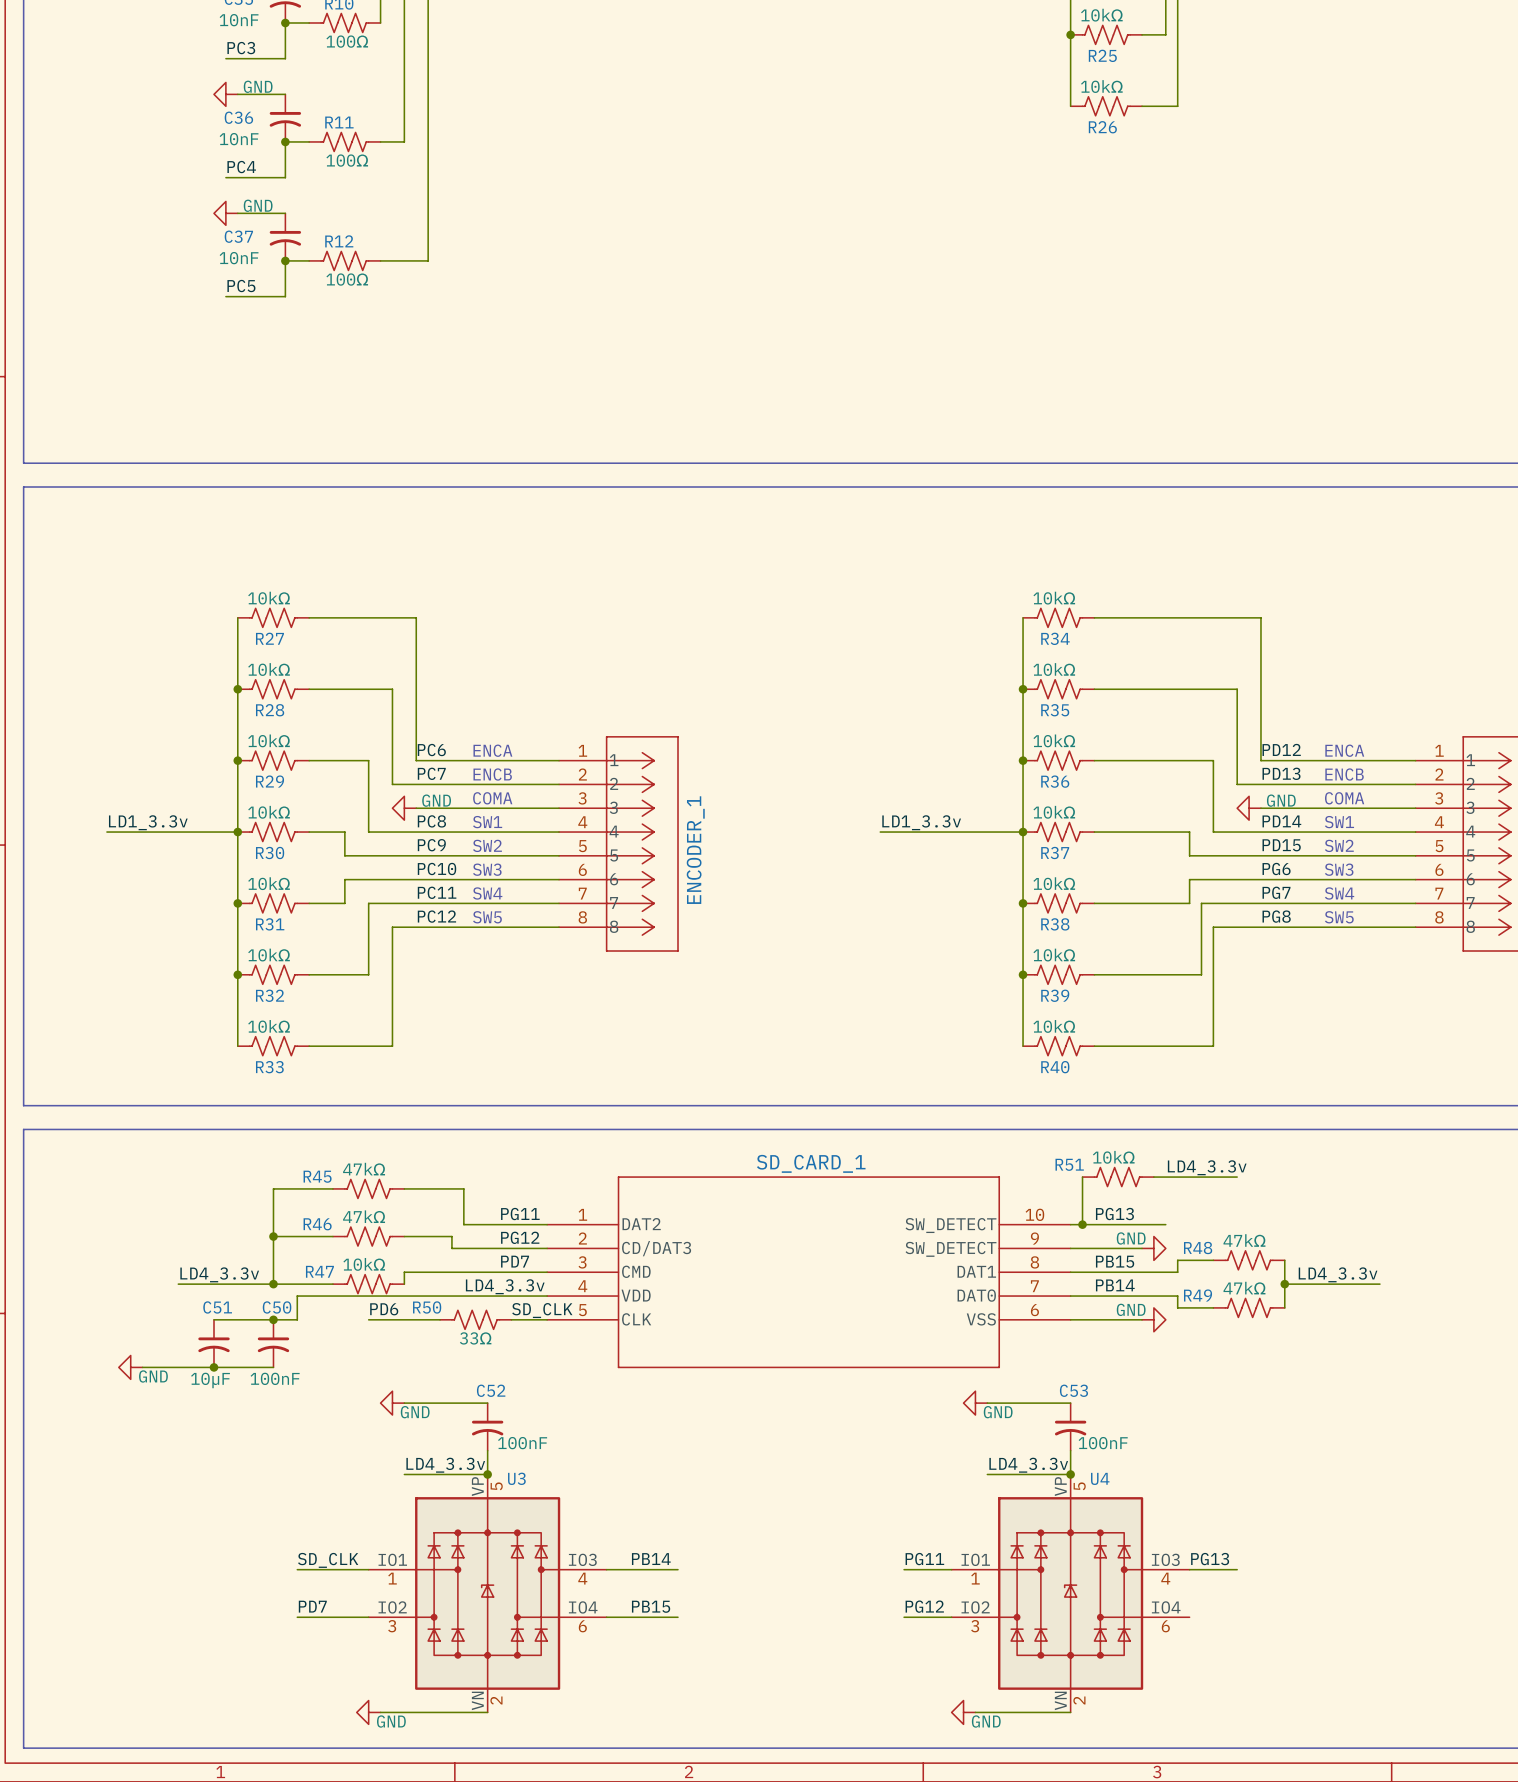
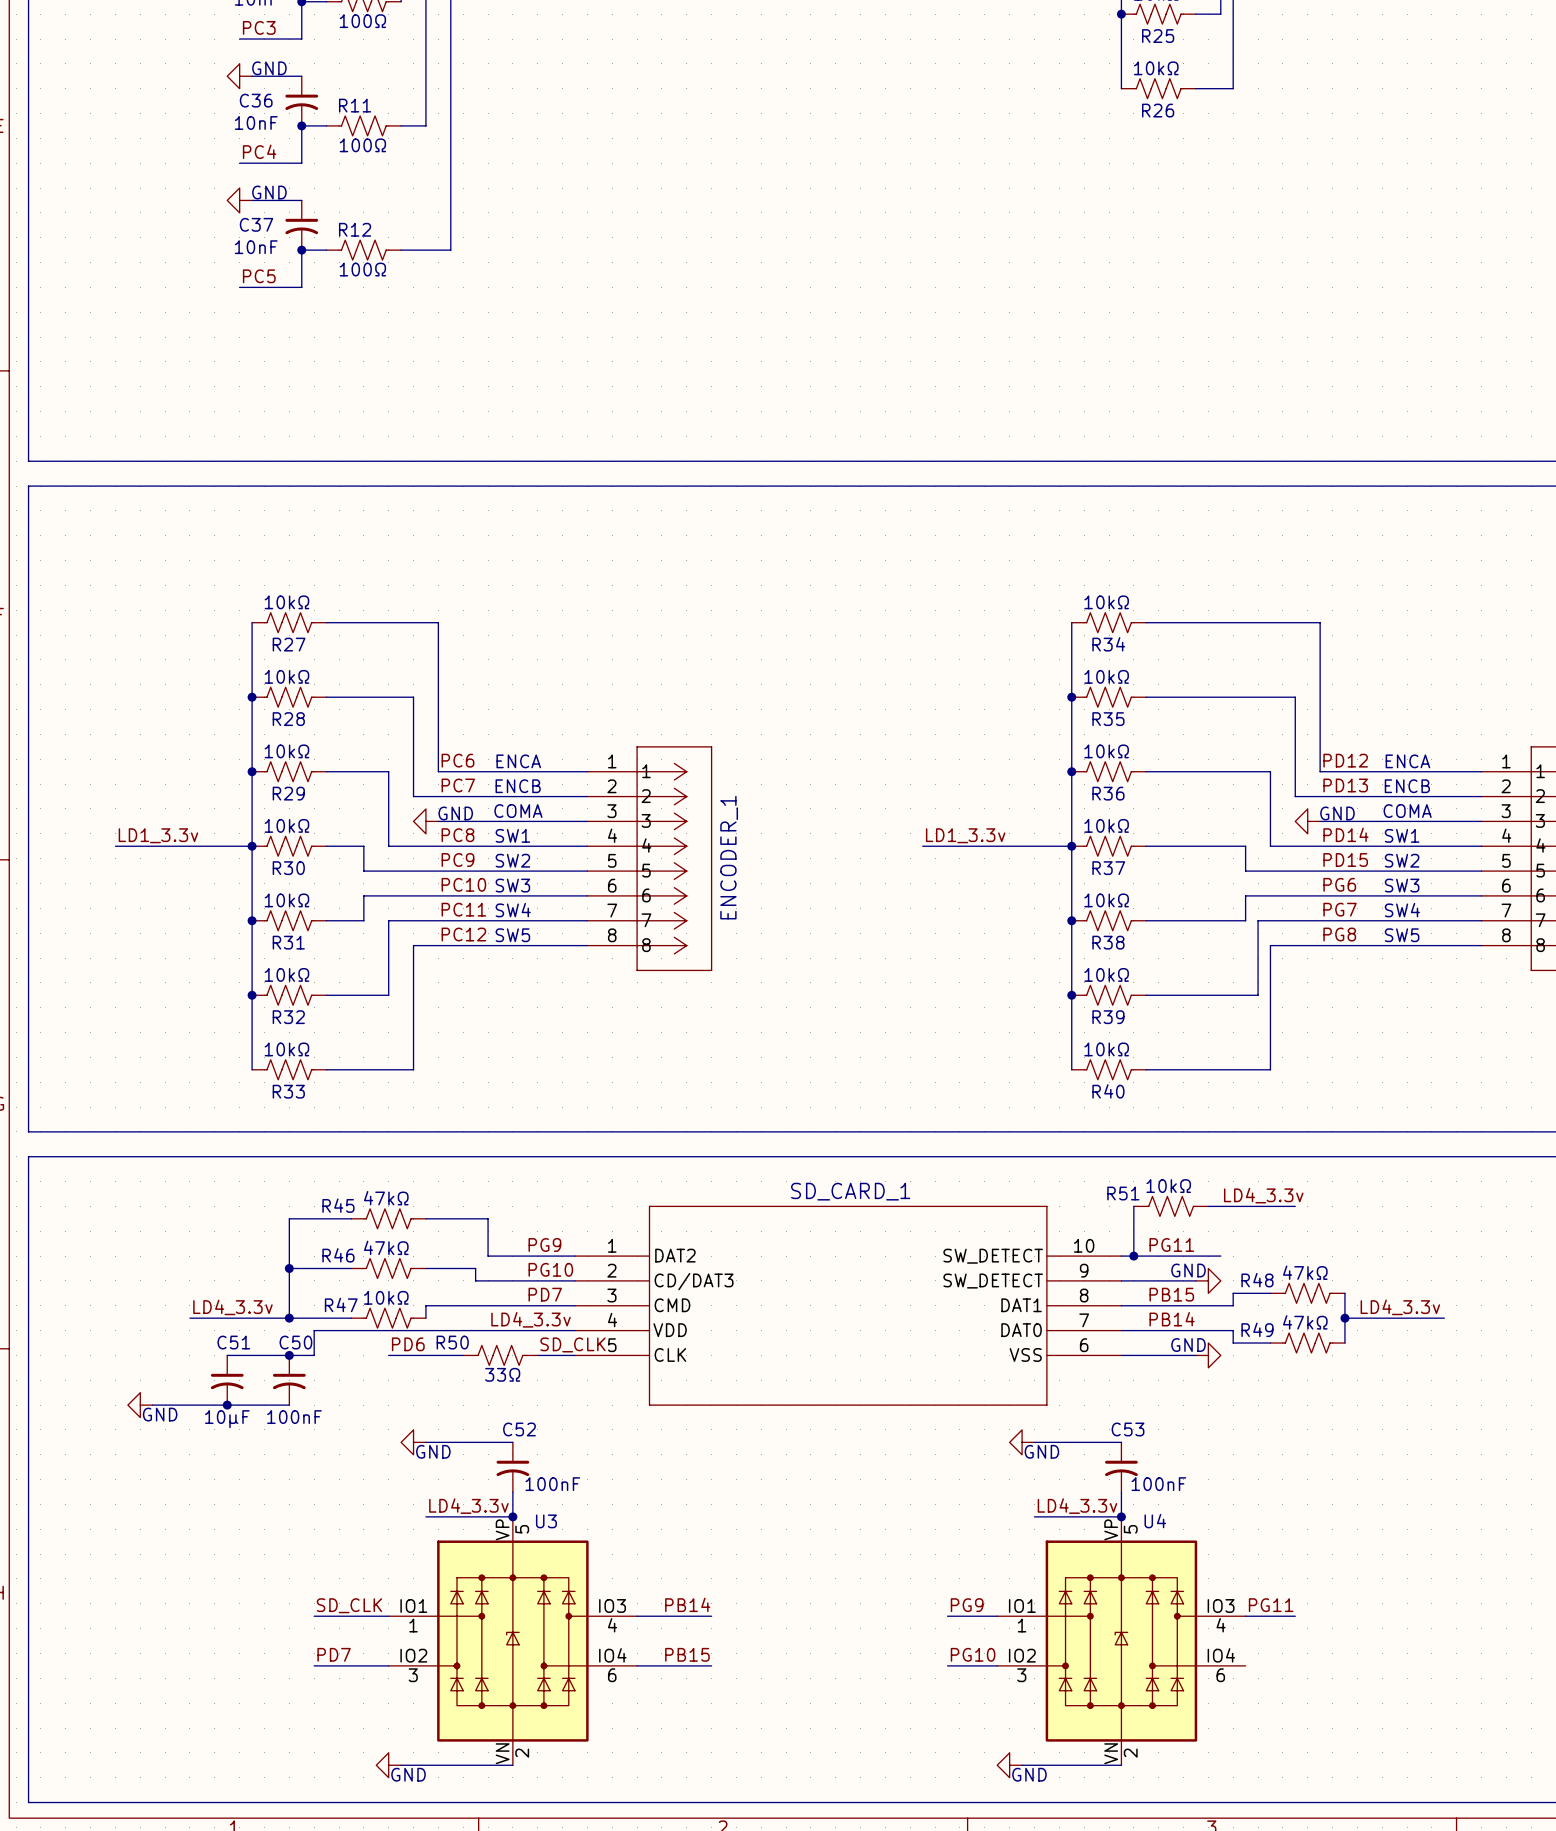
label: PG11 (520, 1214) -> PG9 (544, 1244)
label: PG13 (1114, 1214) -> PG11 (1171, 1244)
label: PG12 (520, 1237) -> PG10 (550, 1269)
label: PG11 (924, 1559) -> PG9 (967, 1605)
label: PG13 (1210, 1559) -> PG11 (1271, 1605)
label: PG12 (924, 1606) -> PG10 (973, 1654)

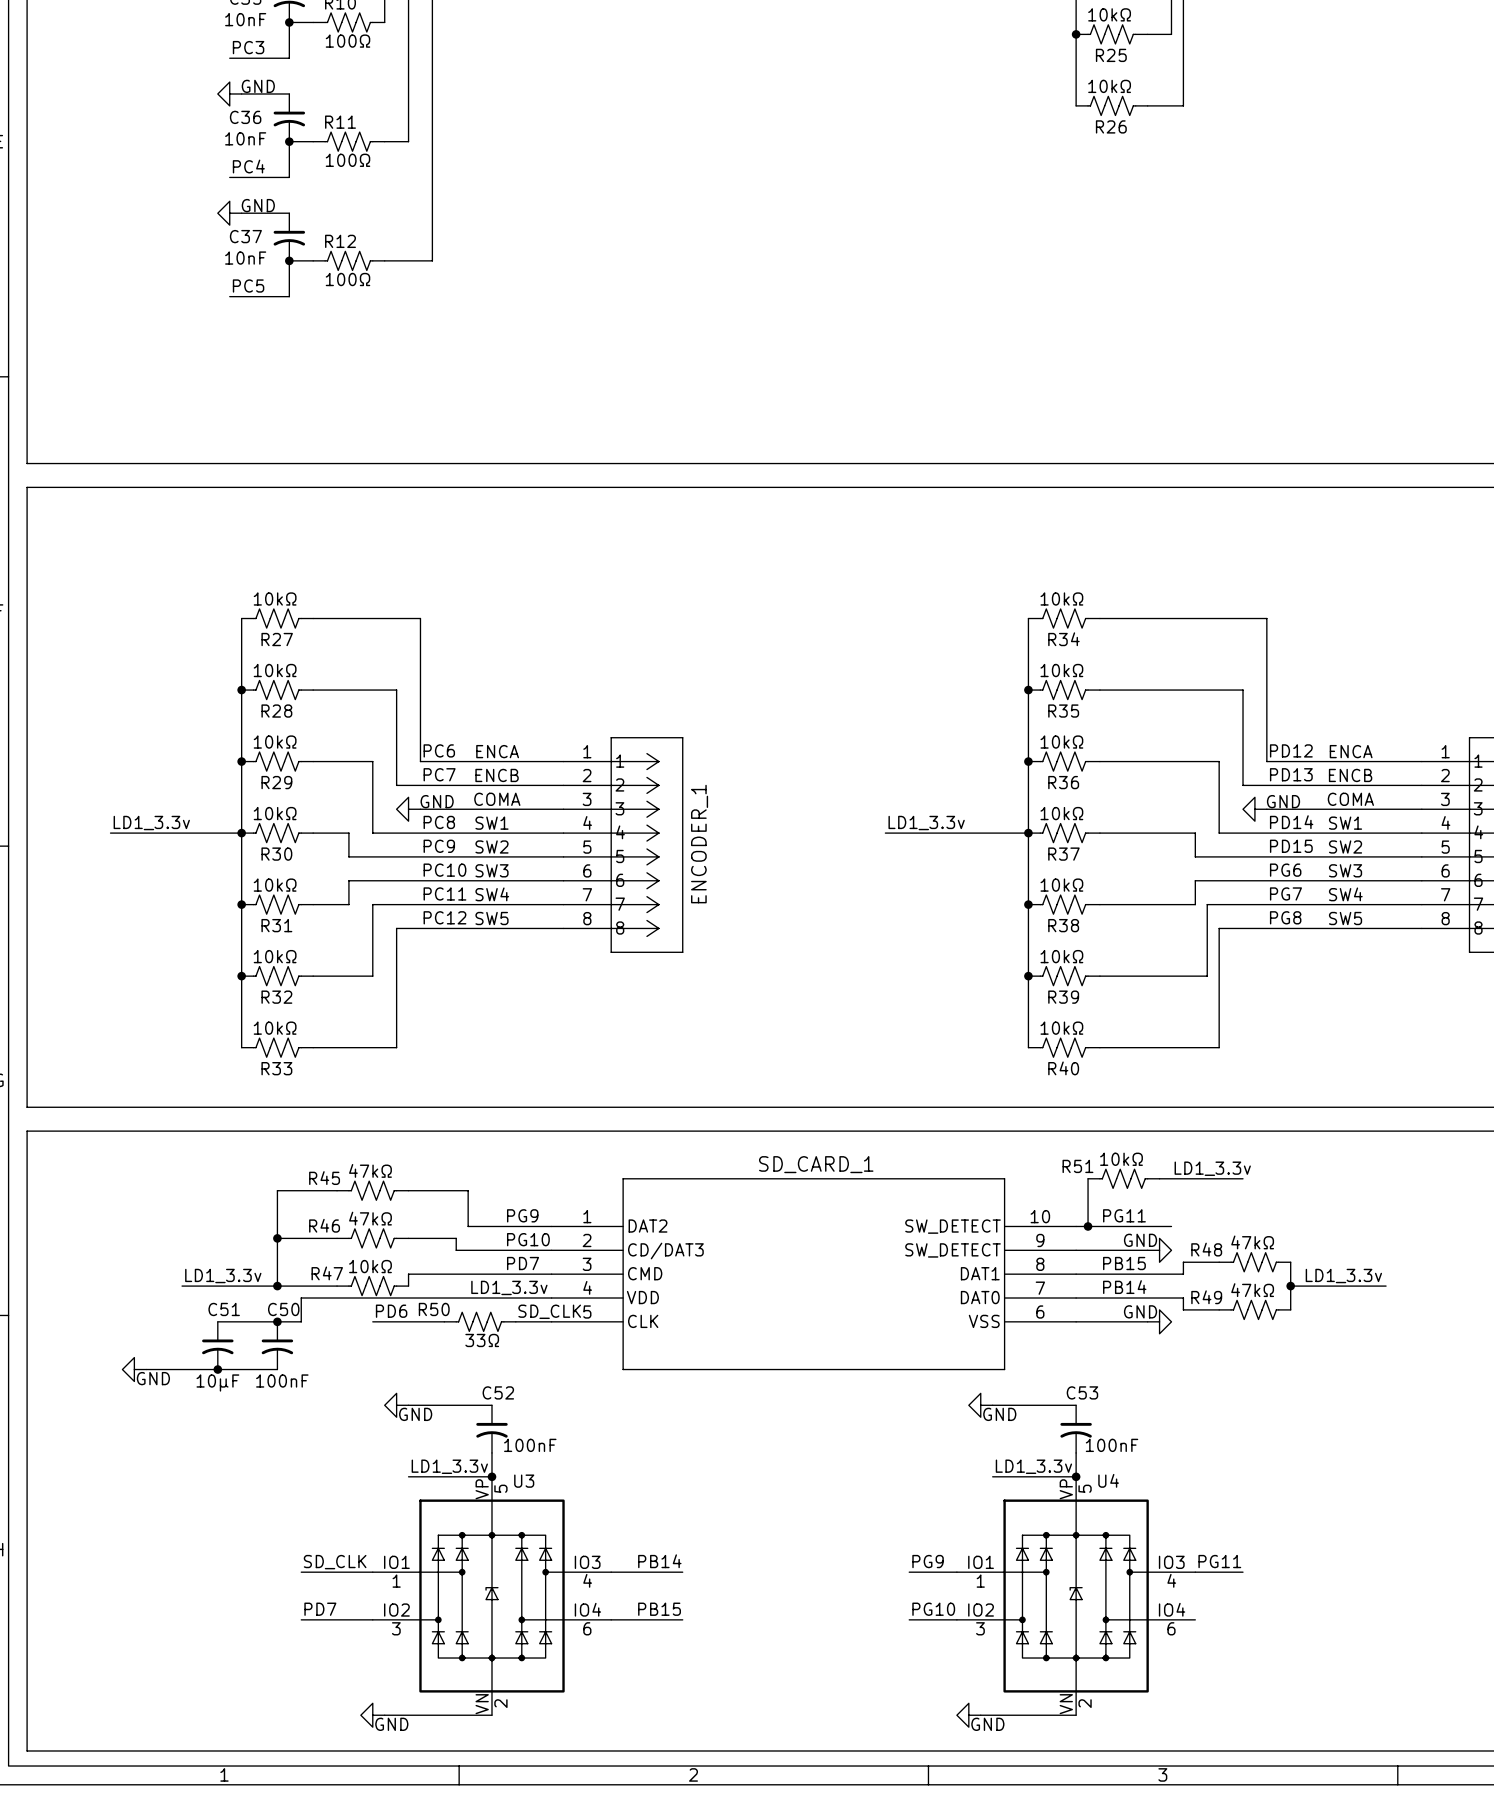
label: LD4_3.3v (1263, 1195) -> LD1_3.3v (1212, 1168)
label: LD4_3.3v (232, 1307) -> LD1_3.3v (223, 1276)
label: LD4_3.3v (1400, 1307) -> LD1_3.3v (1343, 1276)
label: LD4_3.3v (531, 1319) -> LD1_3.3v (509, 1287)
label: LD4_3.3v (468, 1506) -> LD1_3.3v (449, 1466)
label: LD4_3.3v (1077, 1506) -> LD1_3.3v (1033, 1466)

